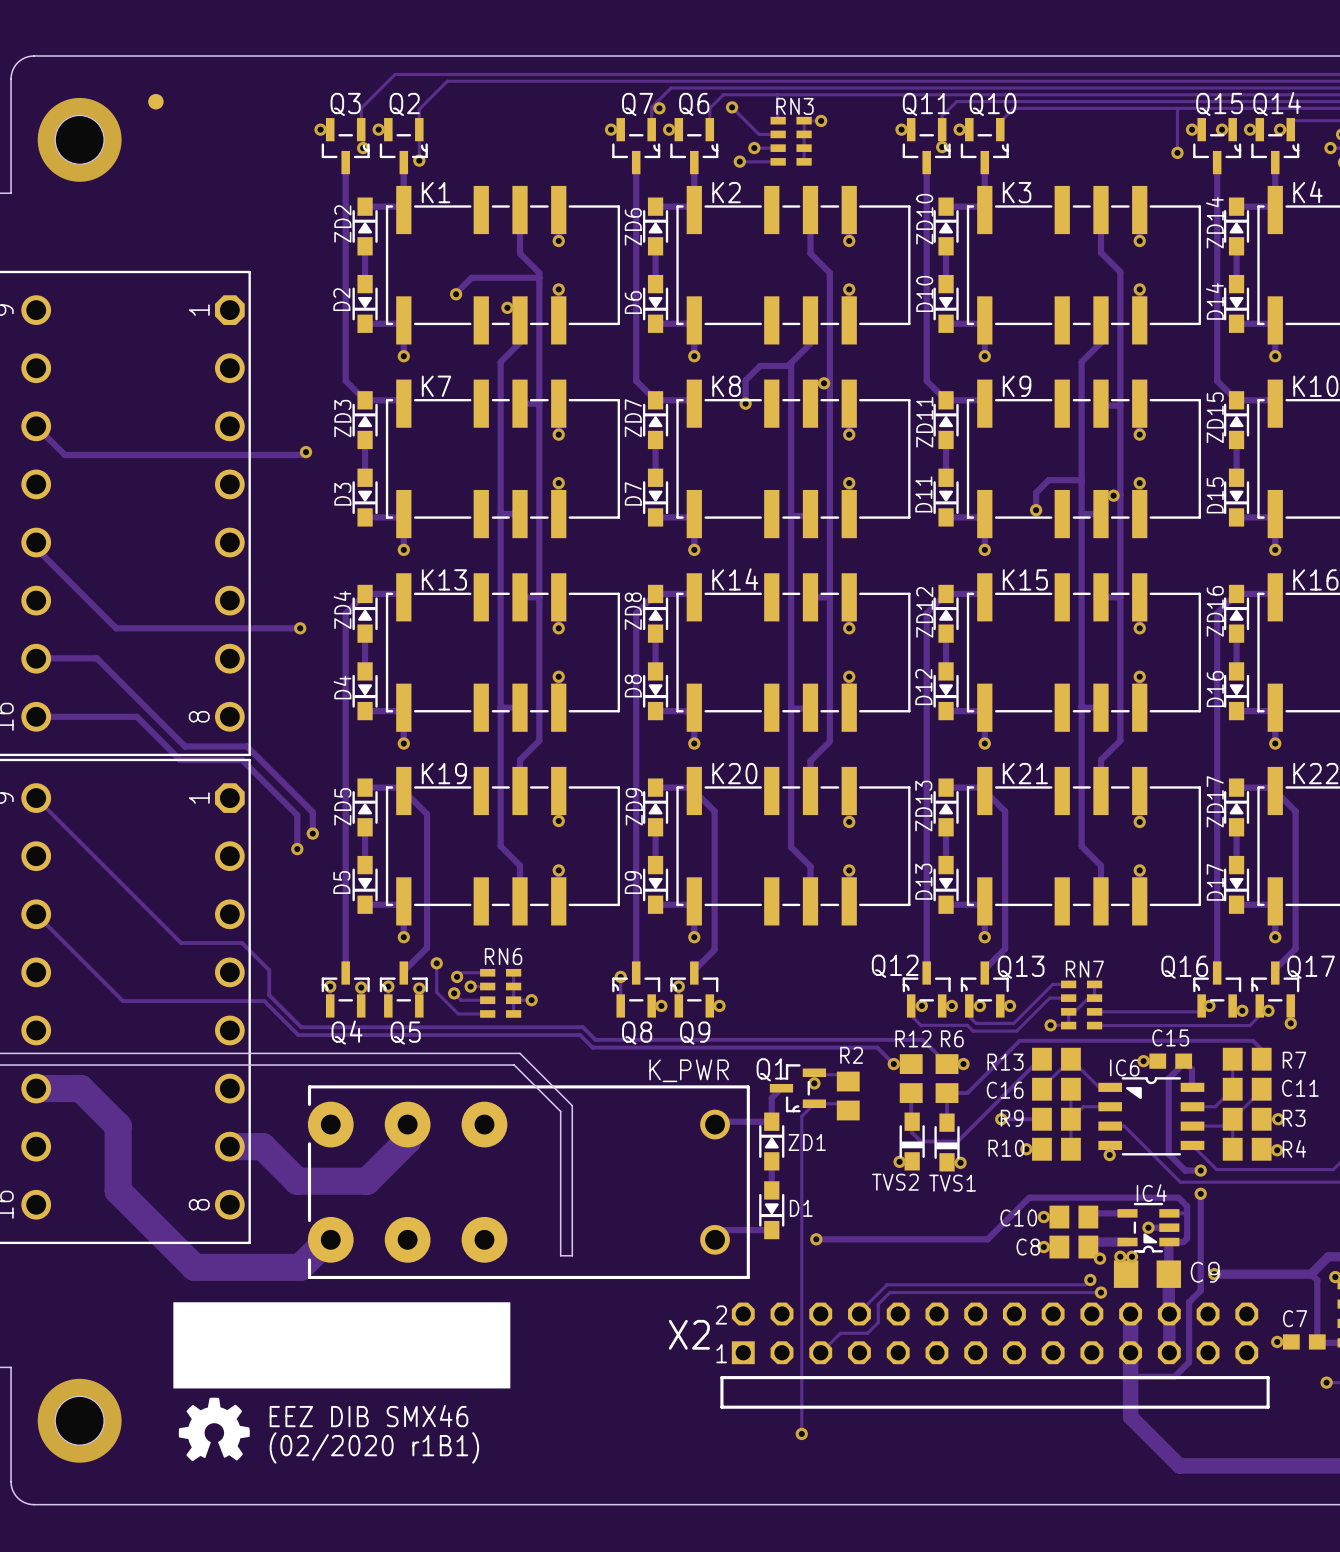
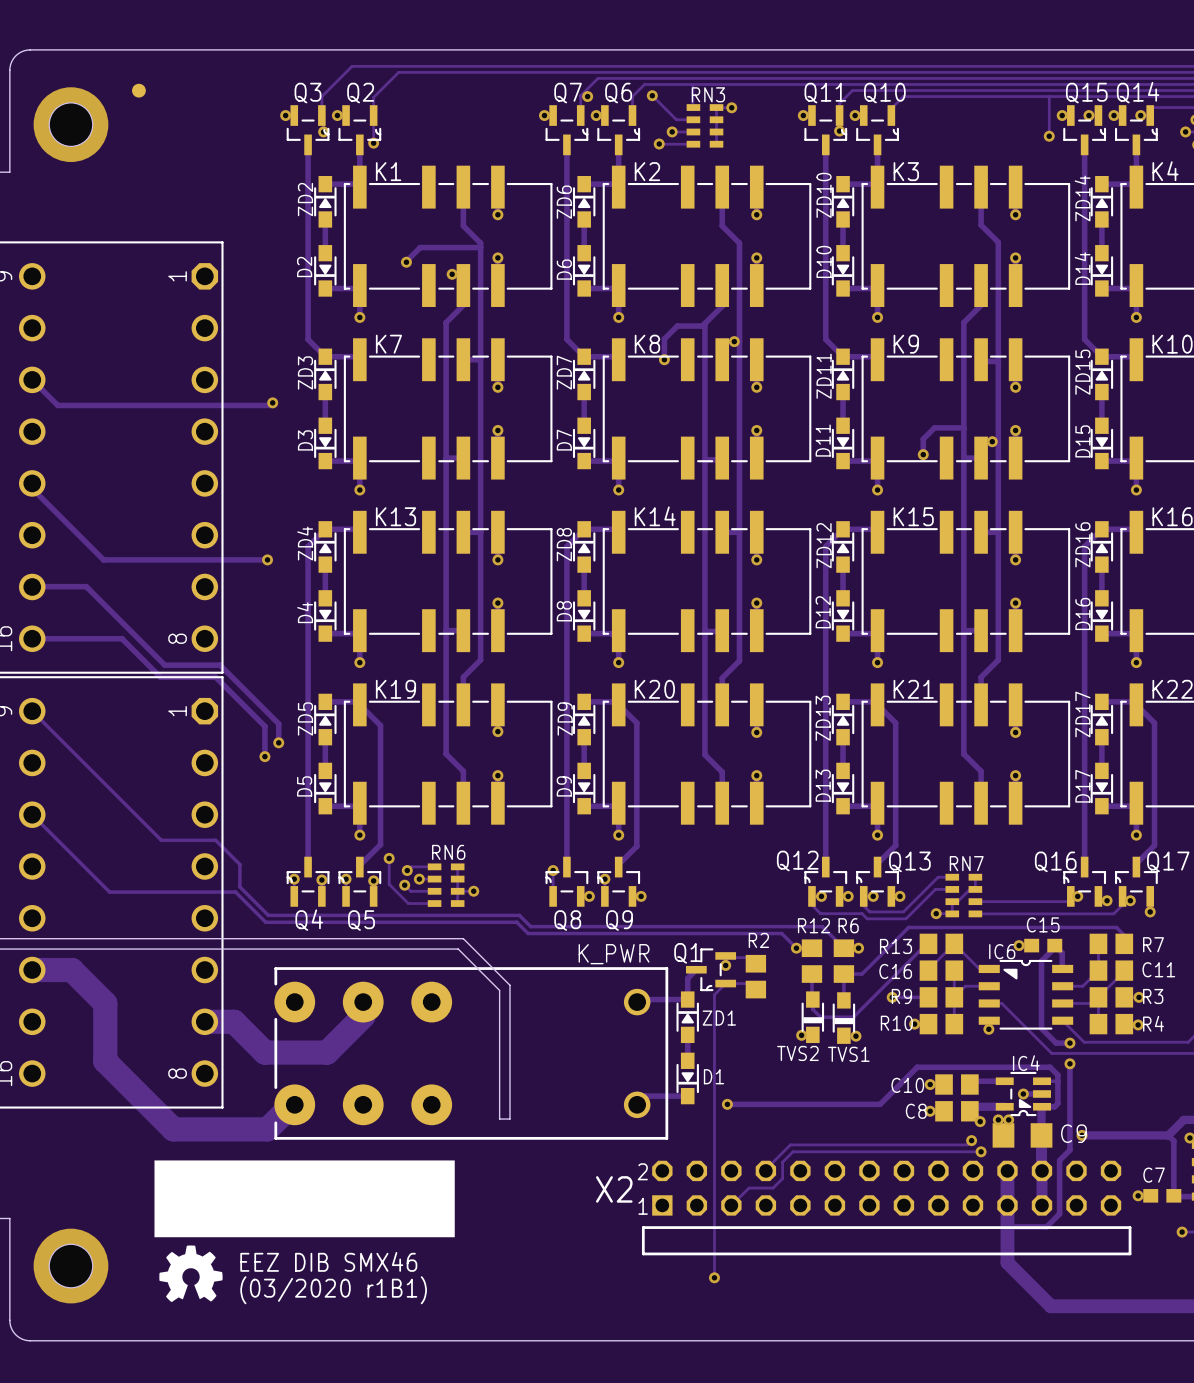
text: (02/2020 r1B1) (374, 1447) -> (03/2020 r1B1) (333, 1290)

